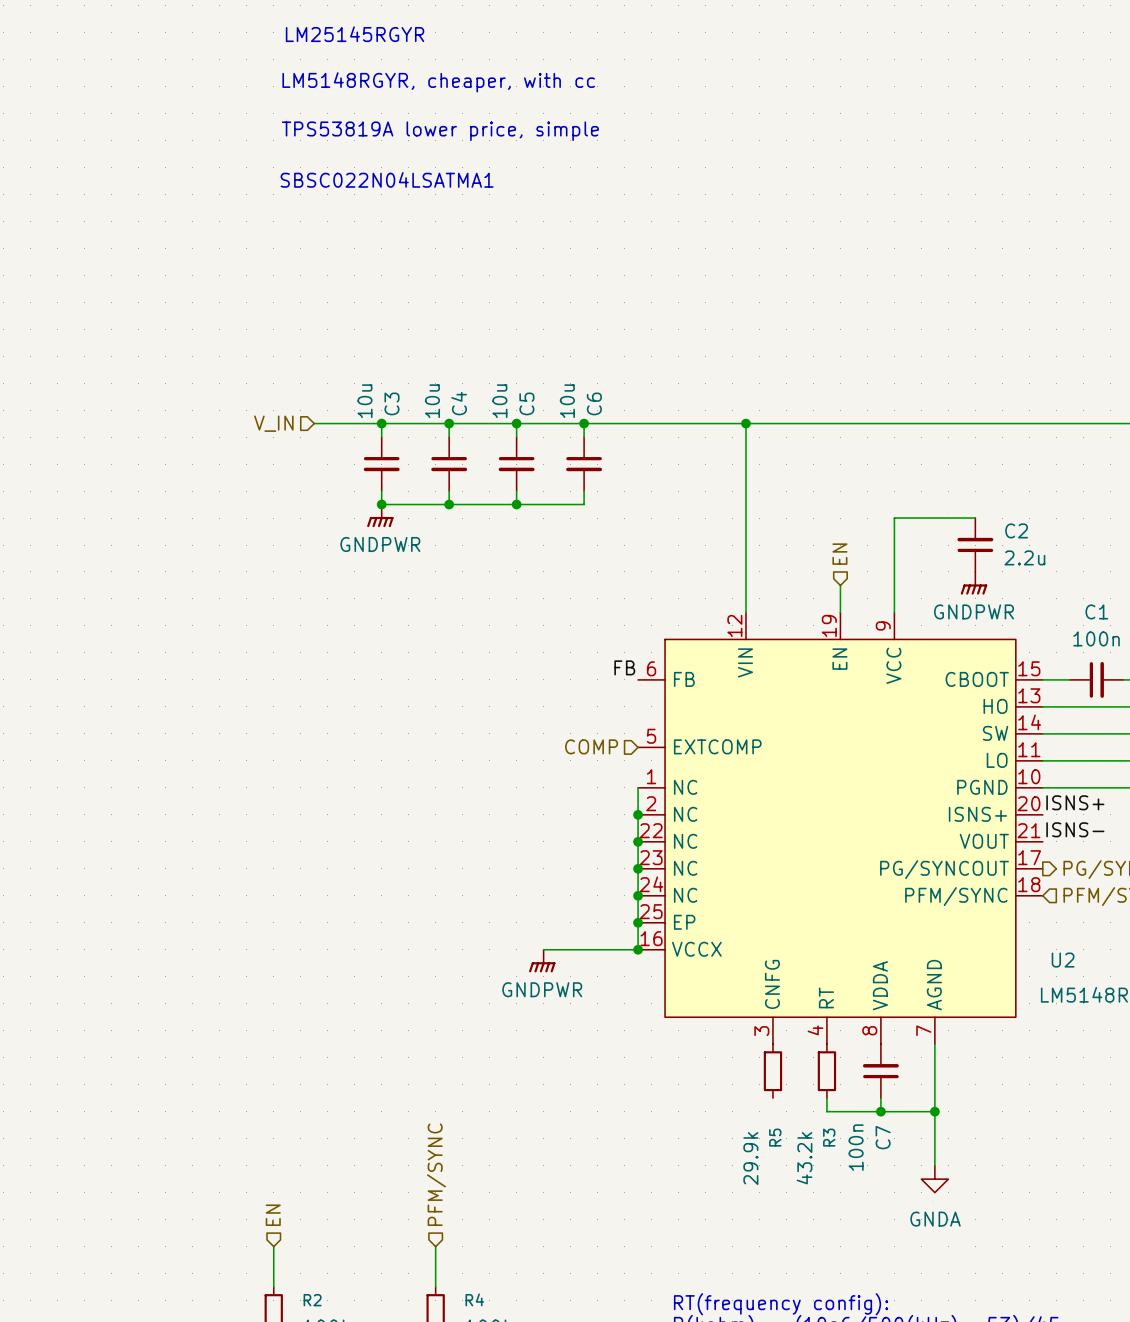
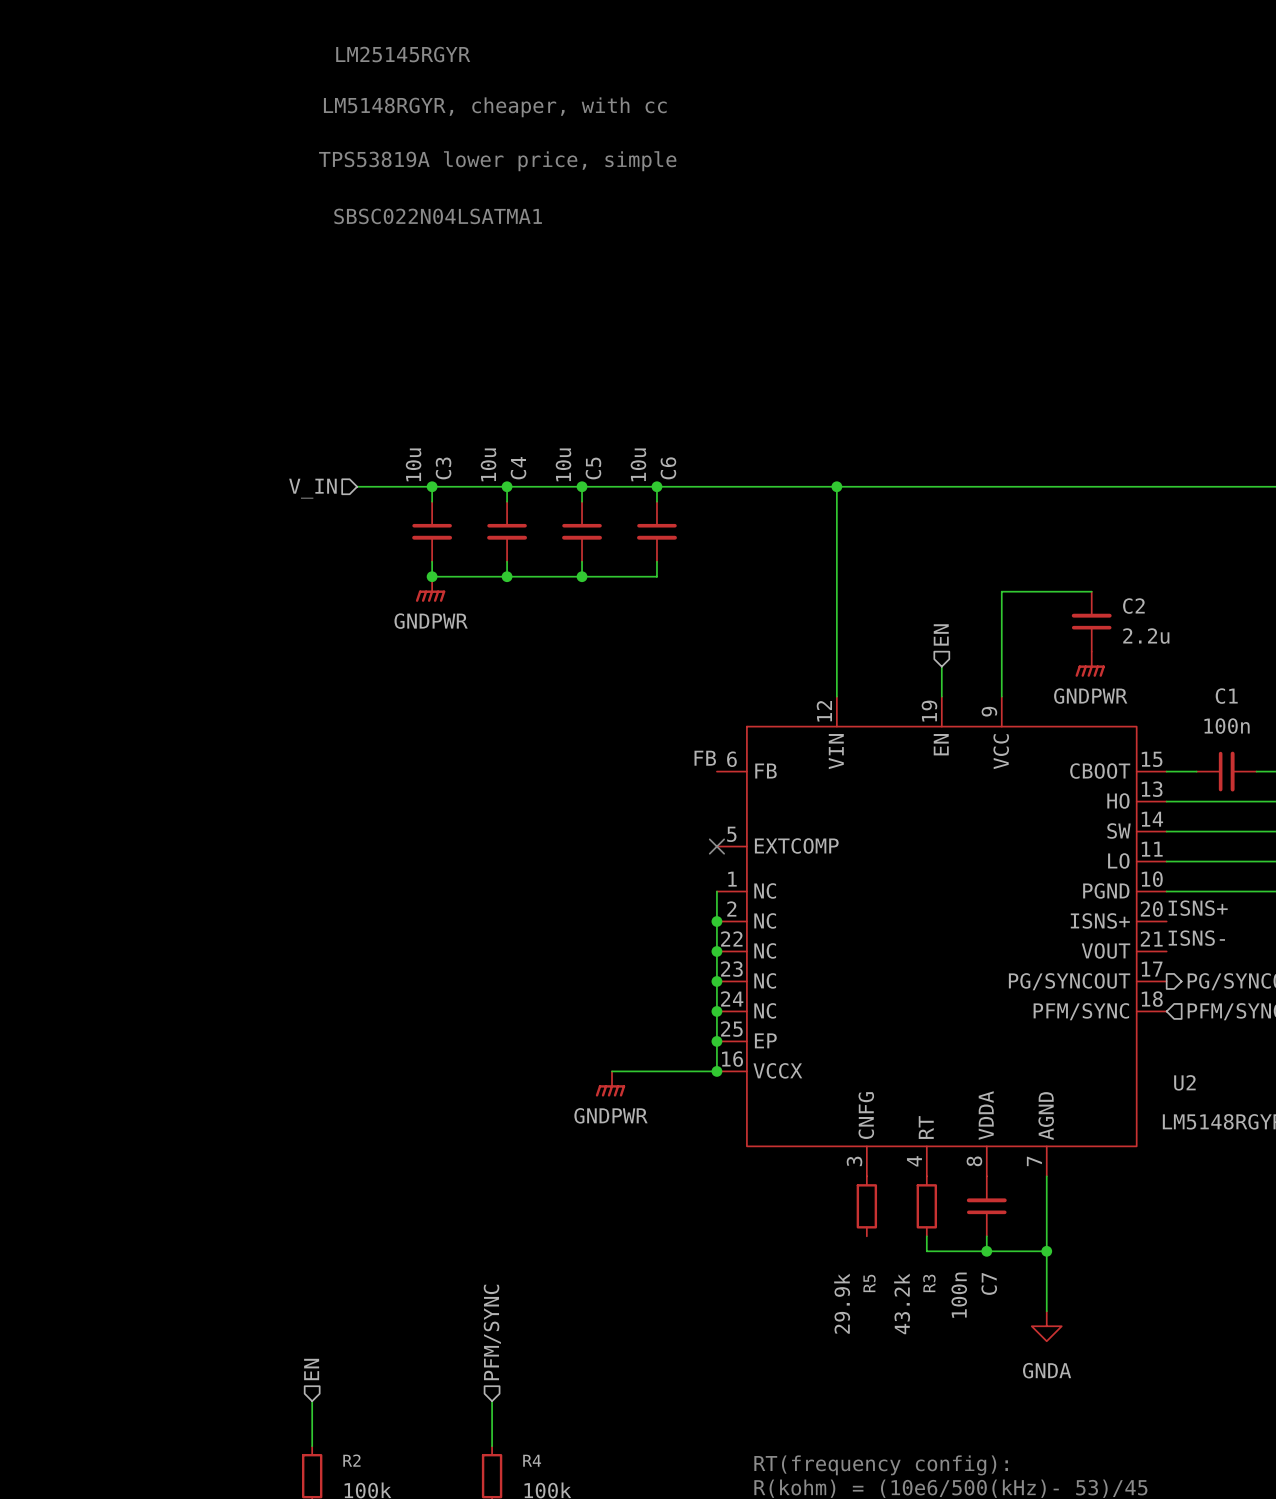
hierarchical label: COMP (591, 746) -> none
no-connect mark: none -> (716, 846)

